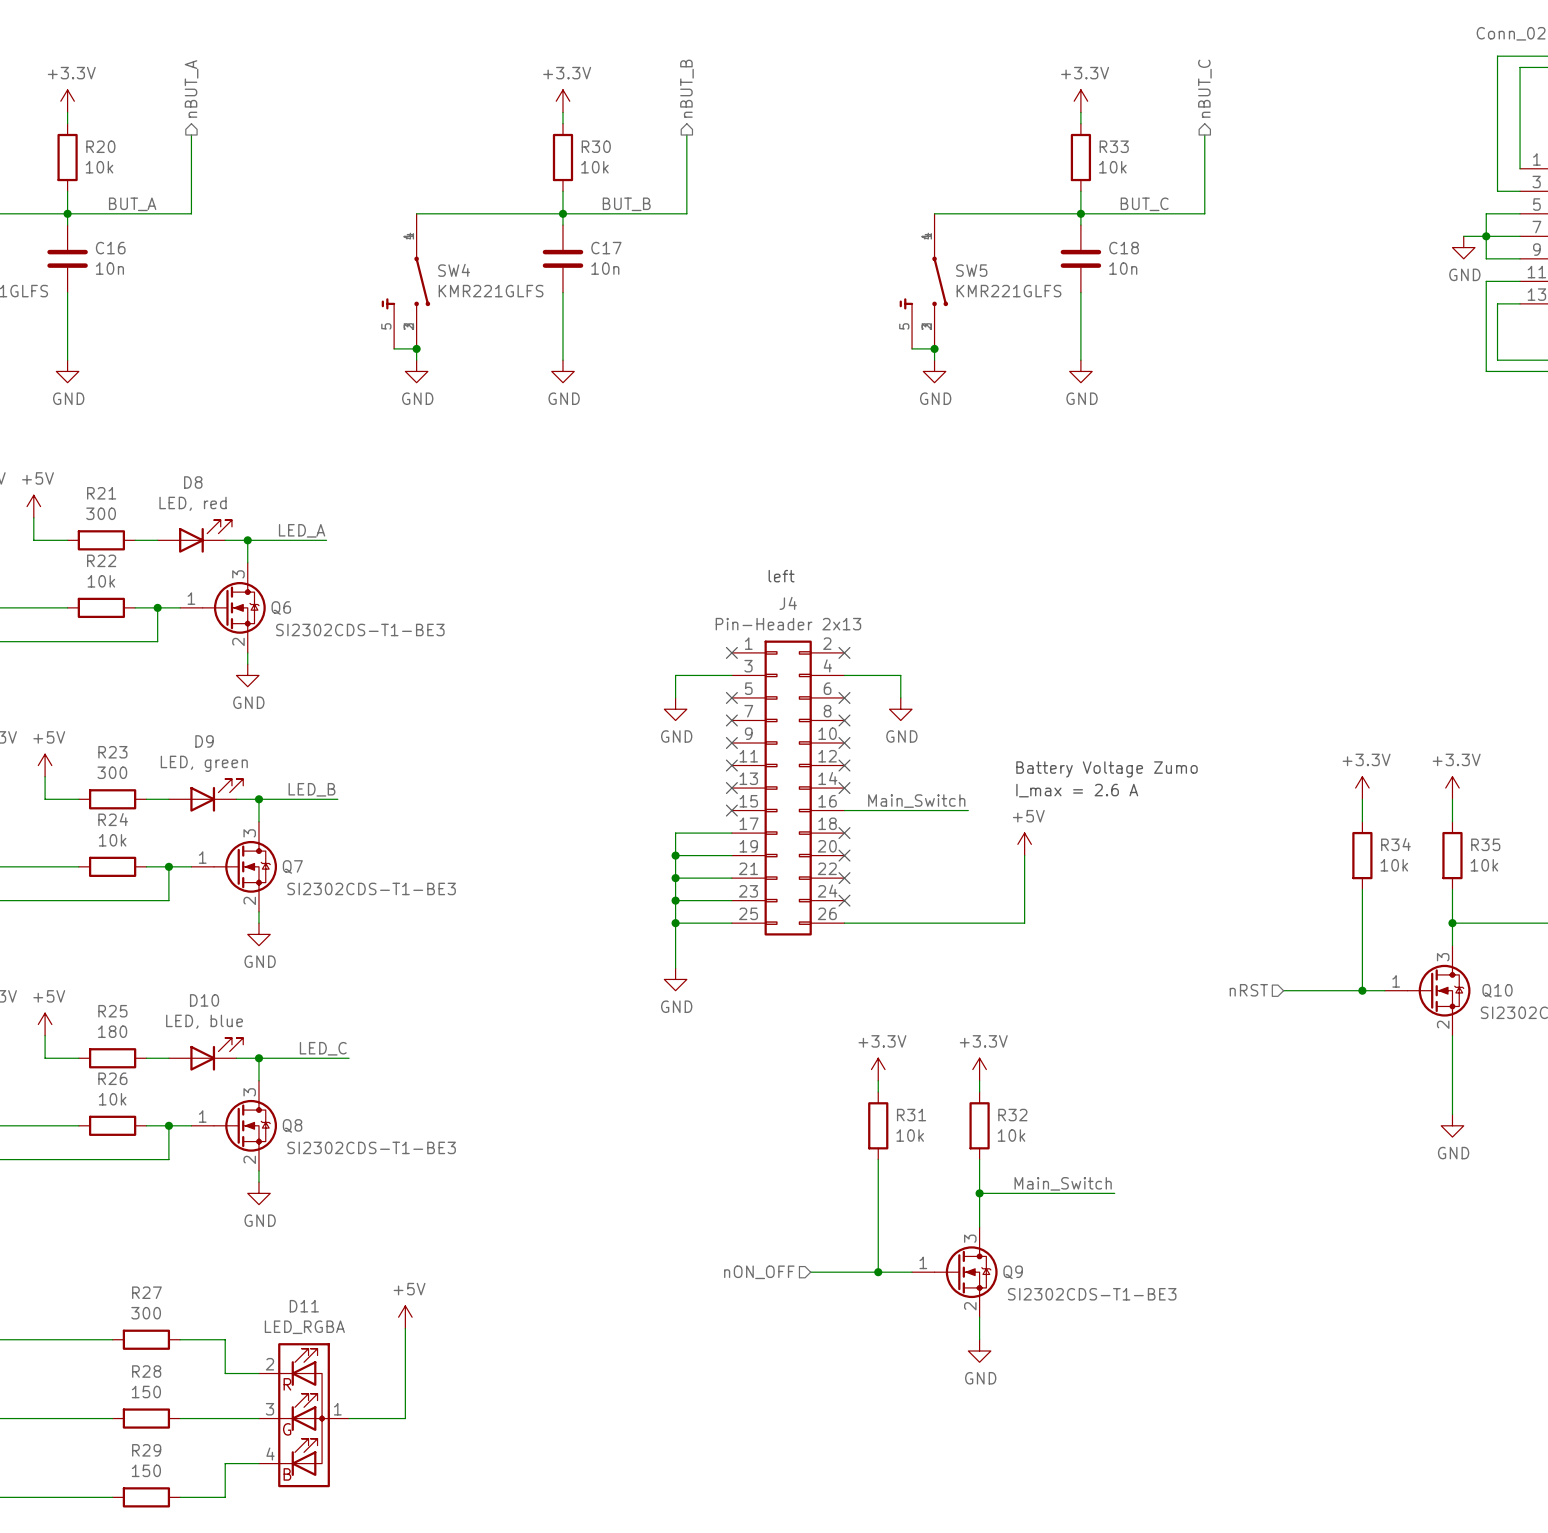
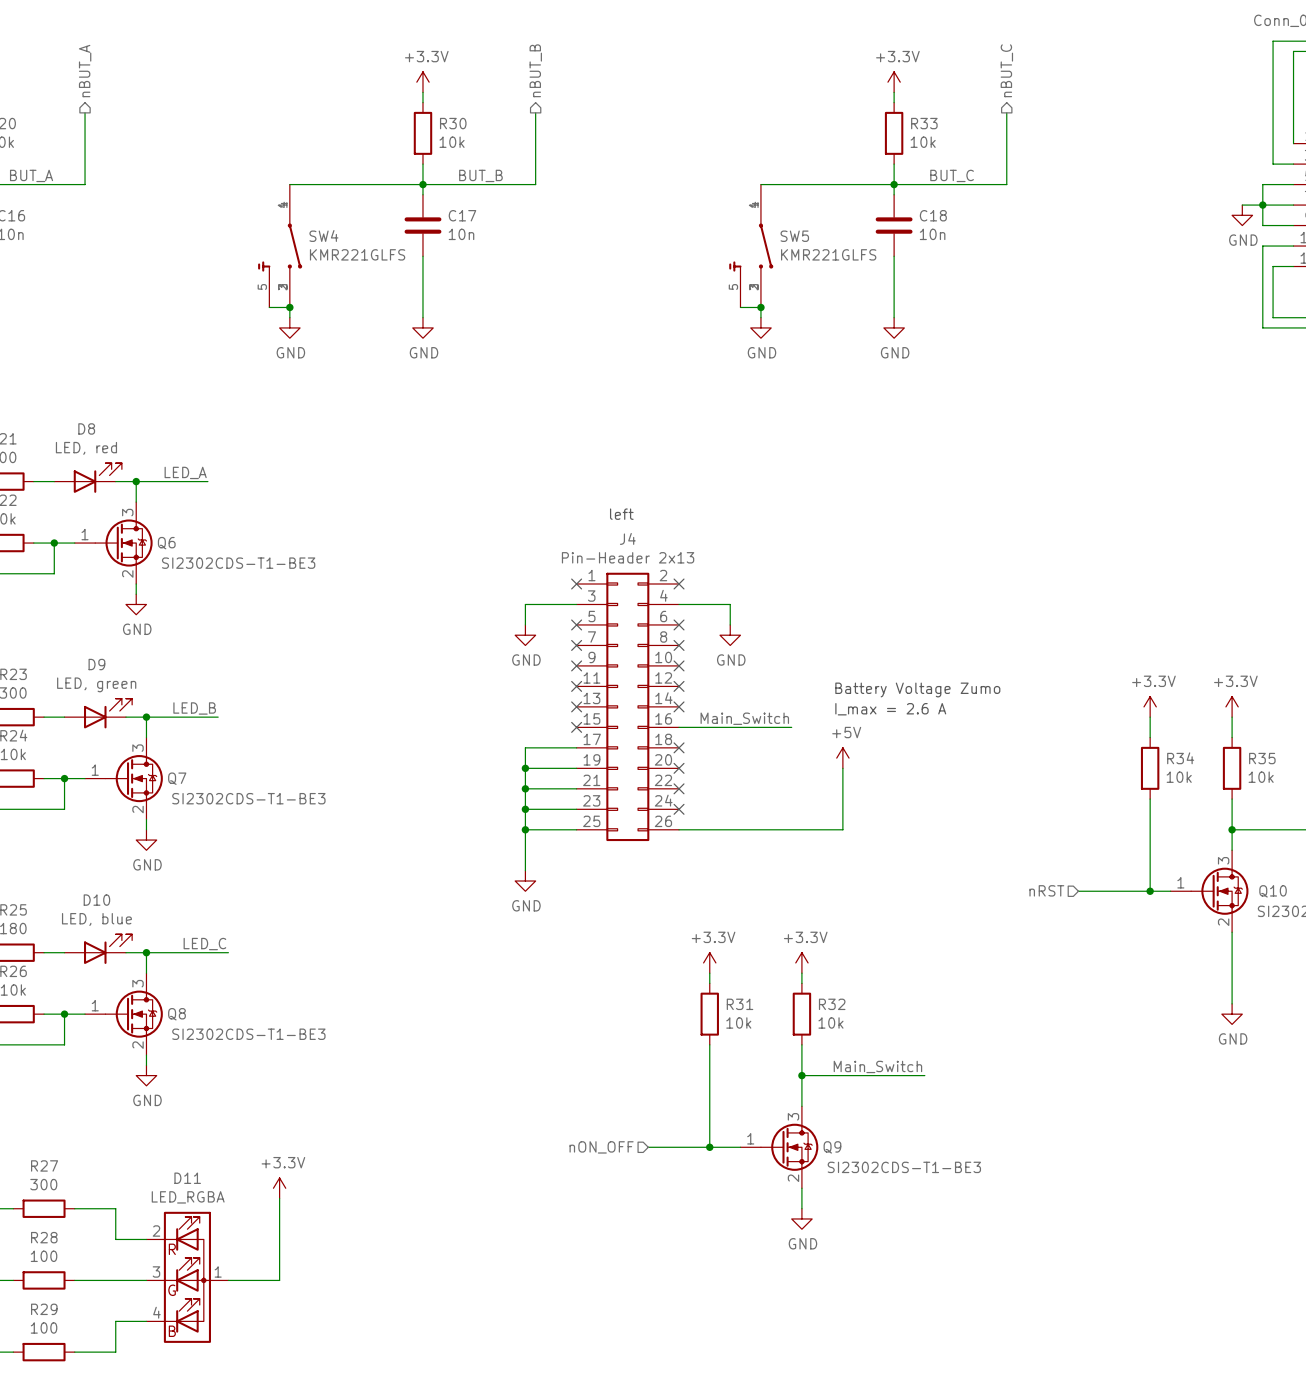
power symbol: +5V (405, 1317) -> +3.3V (279, 1188)
R28 value: 150 (146, 1392) -> 100 (44, 1256)
R29 value: 150 (146, 1470) -> 100 (44, 1327)

